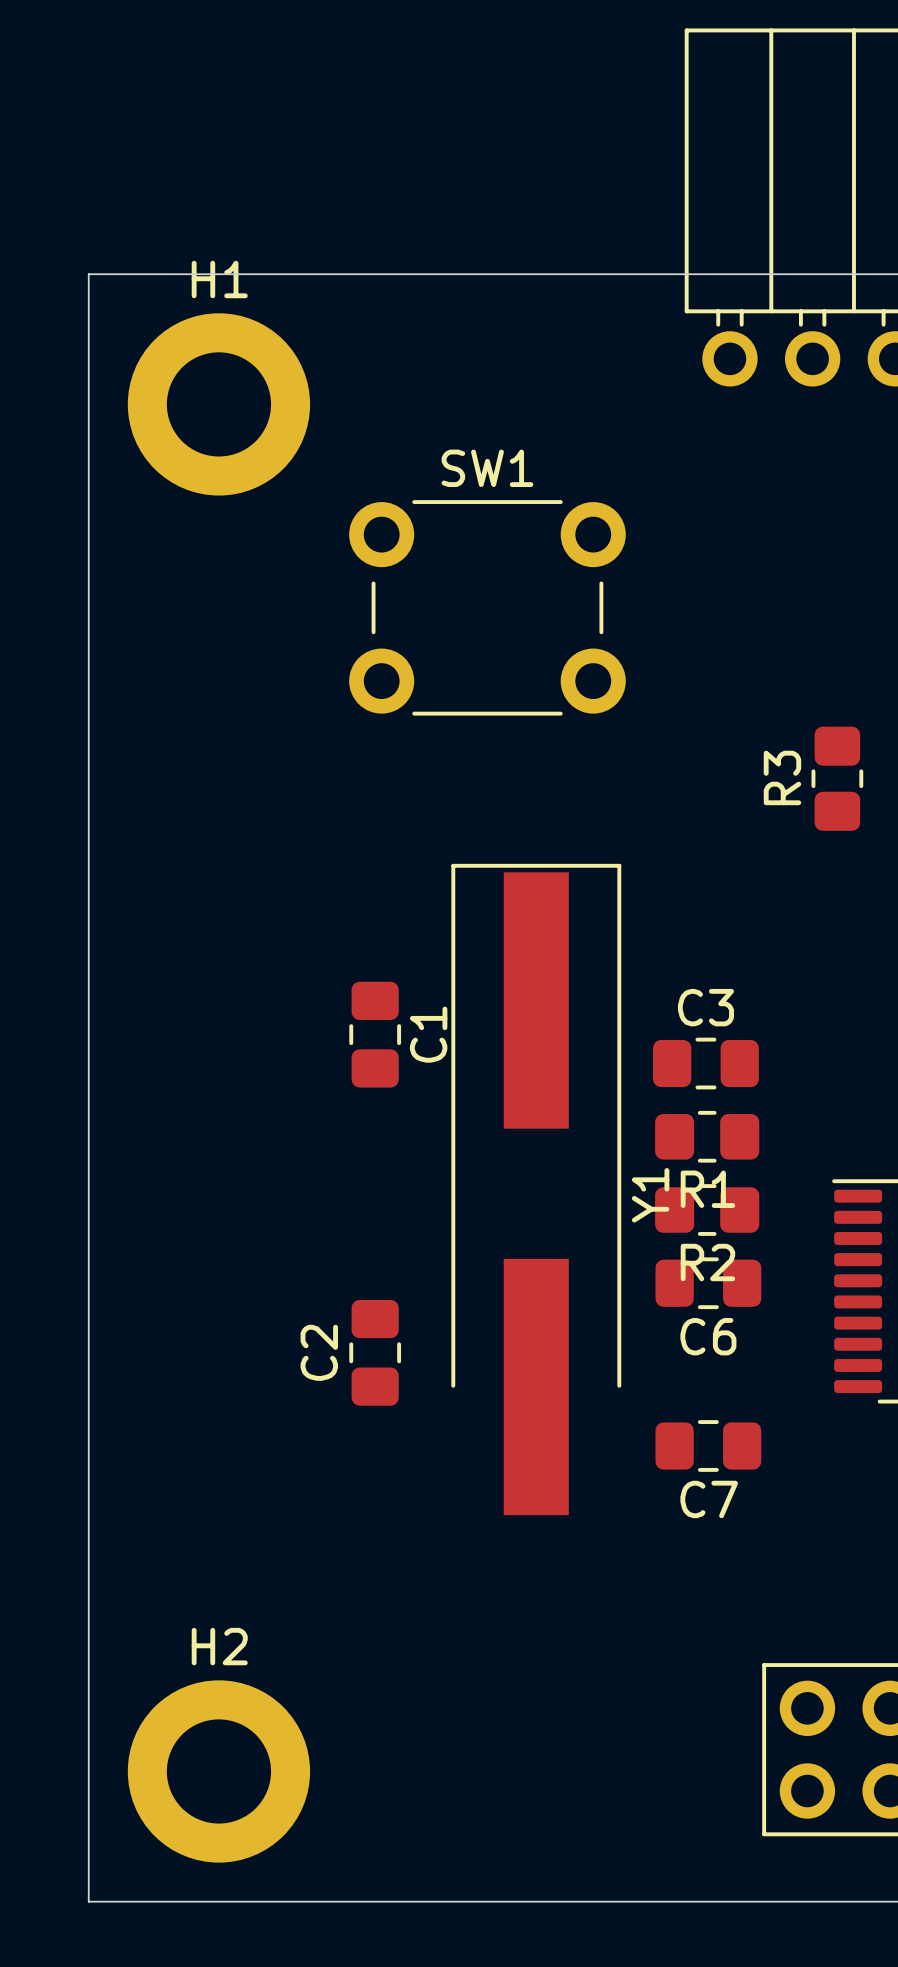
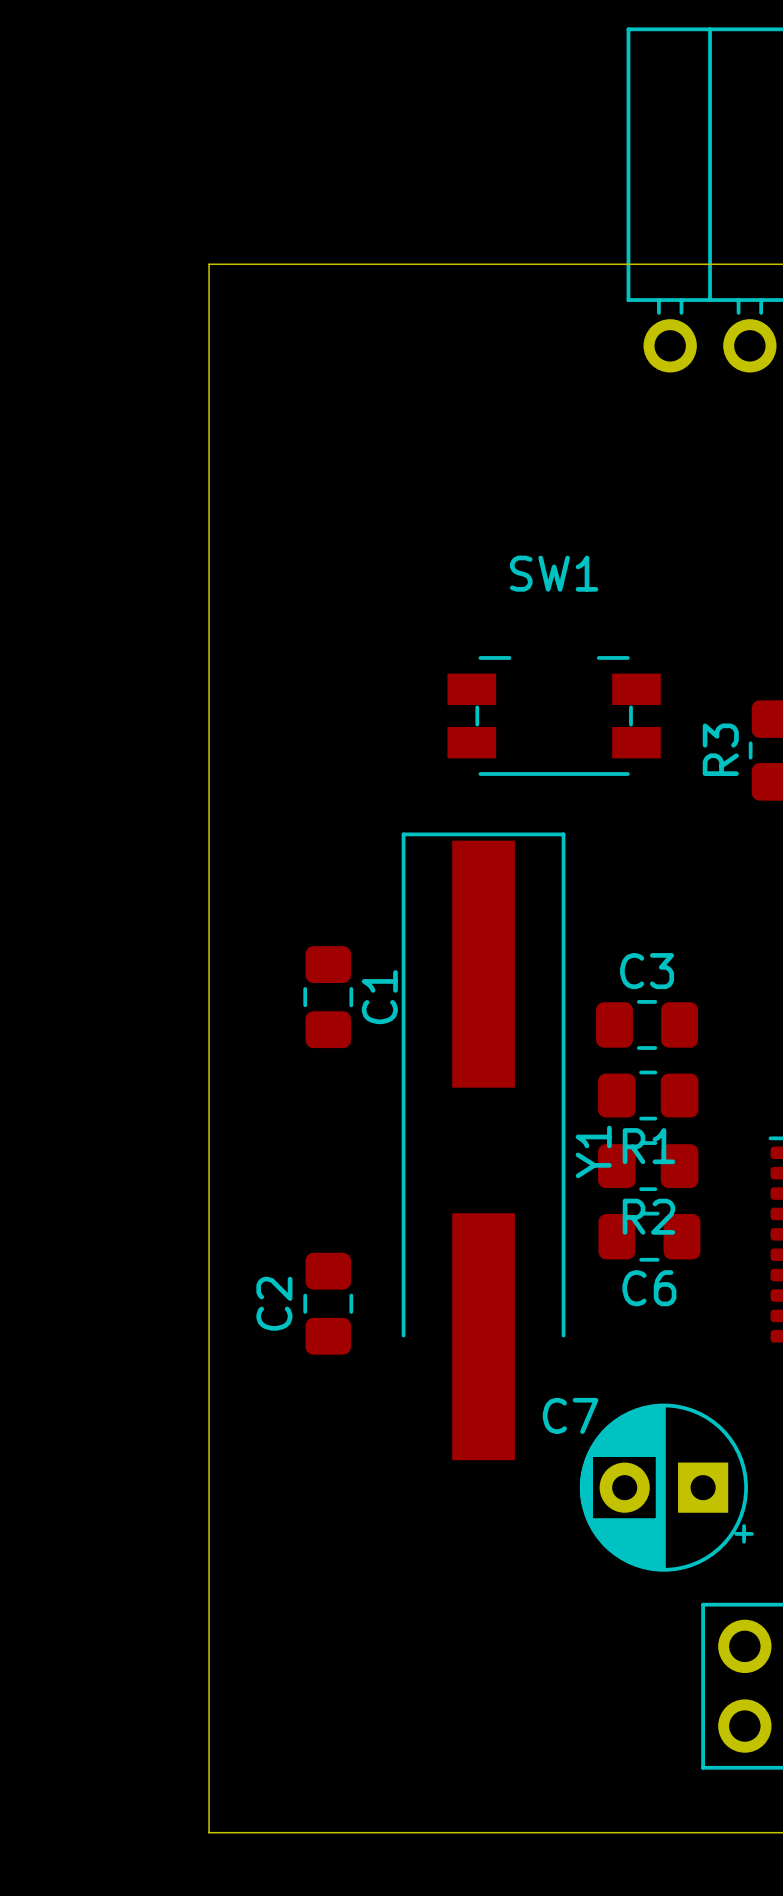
board edge: (251, 274) (88, 274) (88, 1901) (251, 1901) -> (209, 264) (209, 1832)
H1: (218, 404) -> none
SW1 footprint: [349, 500, 626, 716] -> [447, 656, 661, 776]
C7 footprint: [655, 1420, 762, 1472] -> [579, 1403, 754, 1572]
C7 name position: C7 (709, 1499) -> C7 (570, 1415)
H2: (218, 1771) -> none

